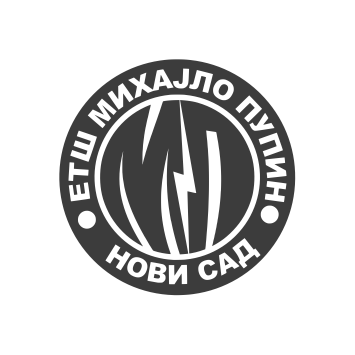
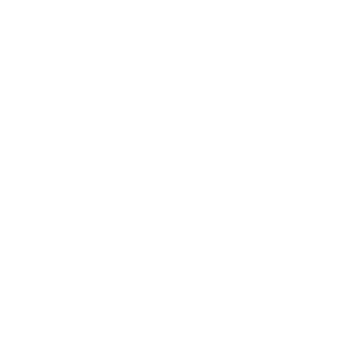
drawing: [59, 59, 296, 296] -> none

